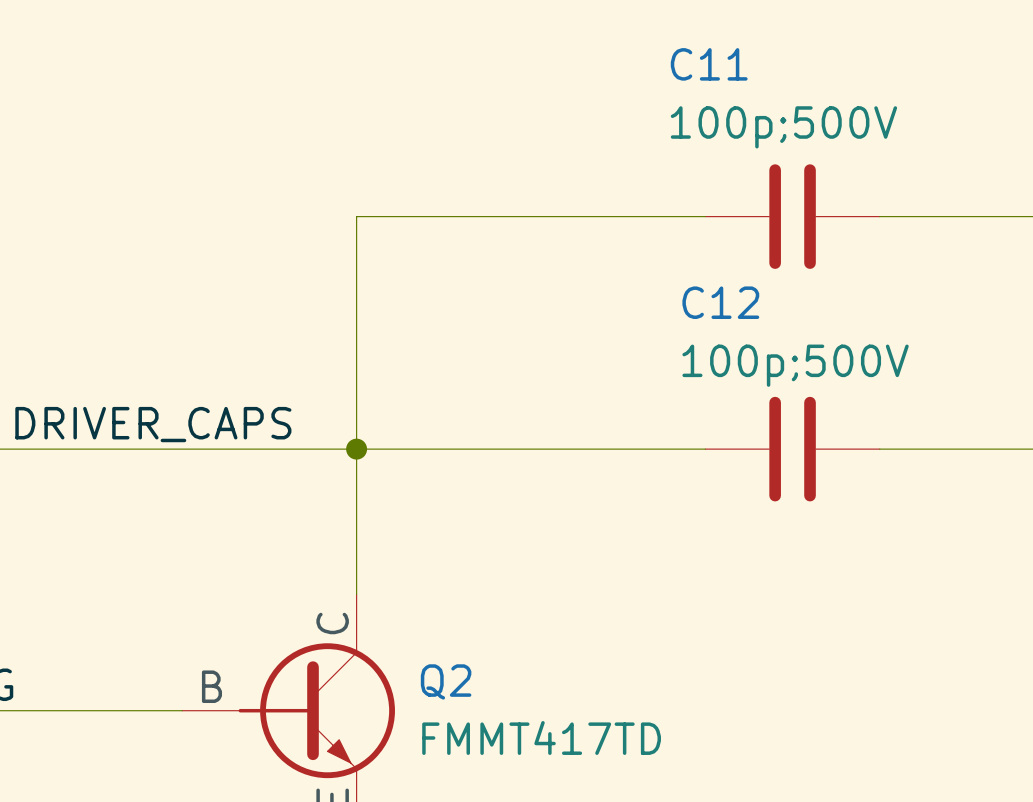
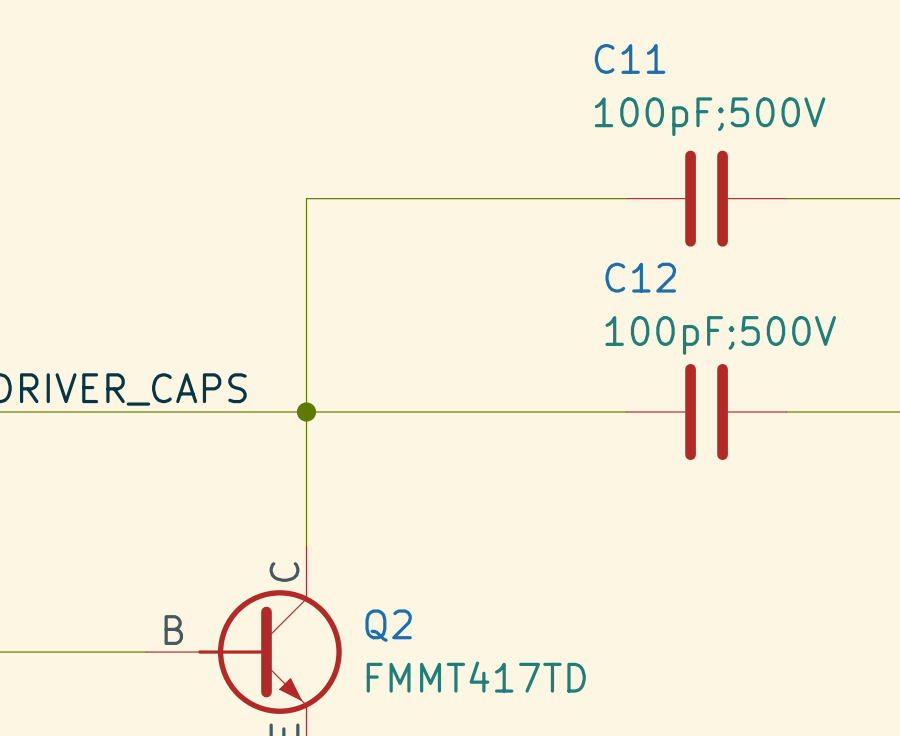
C11 value: 100p;500V (783, 127) -> 100pF;500V (710, 116)
C12 value: 100p;500V (795, 365) -> 100pF;500V (720, 335)

